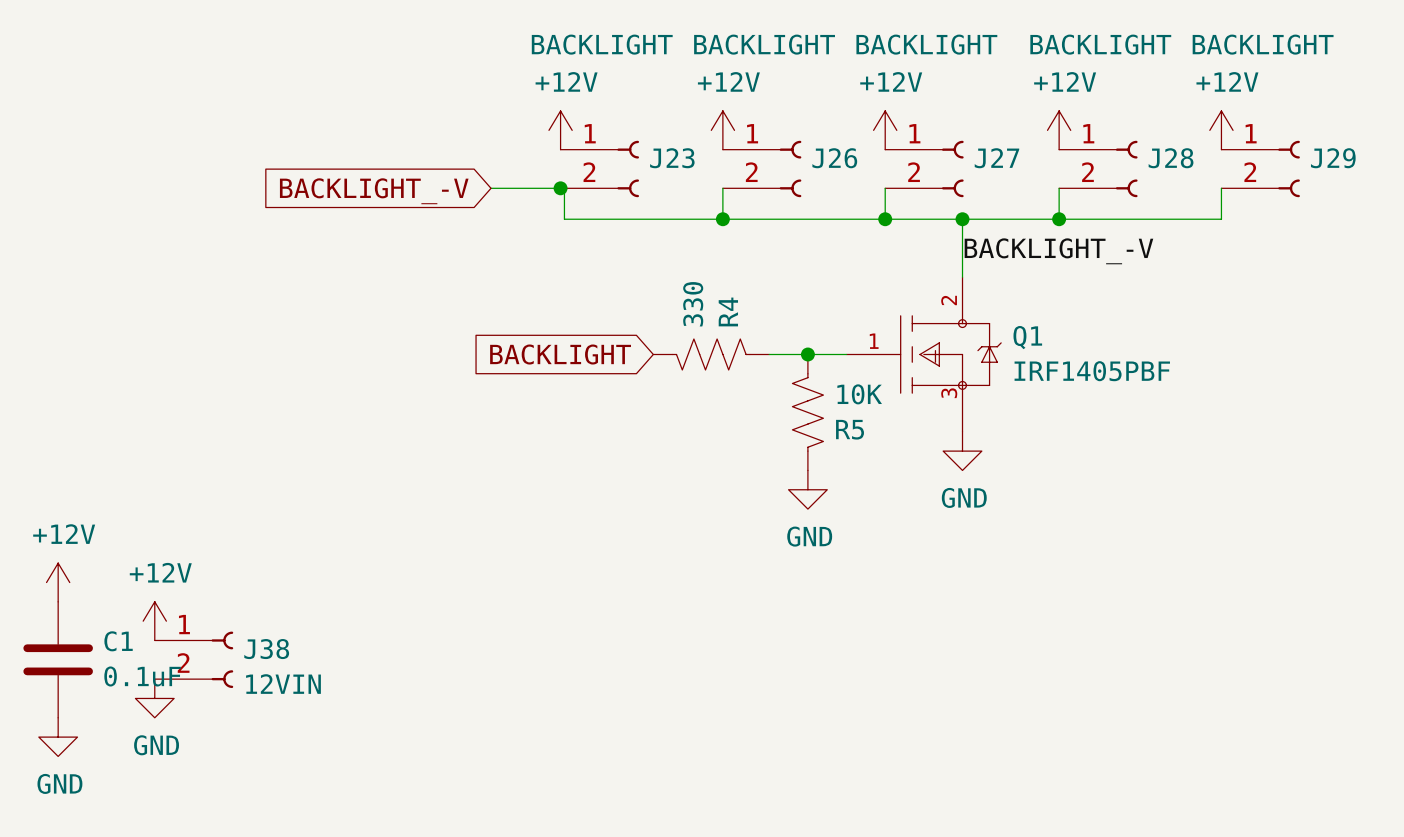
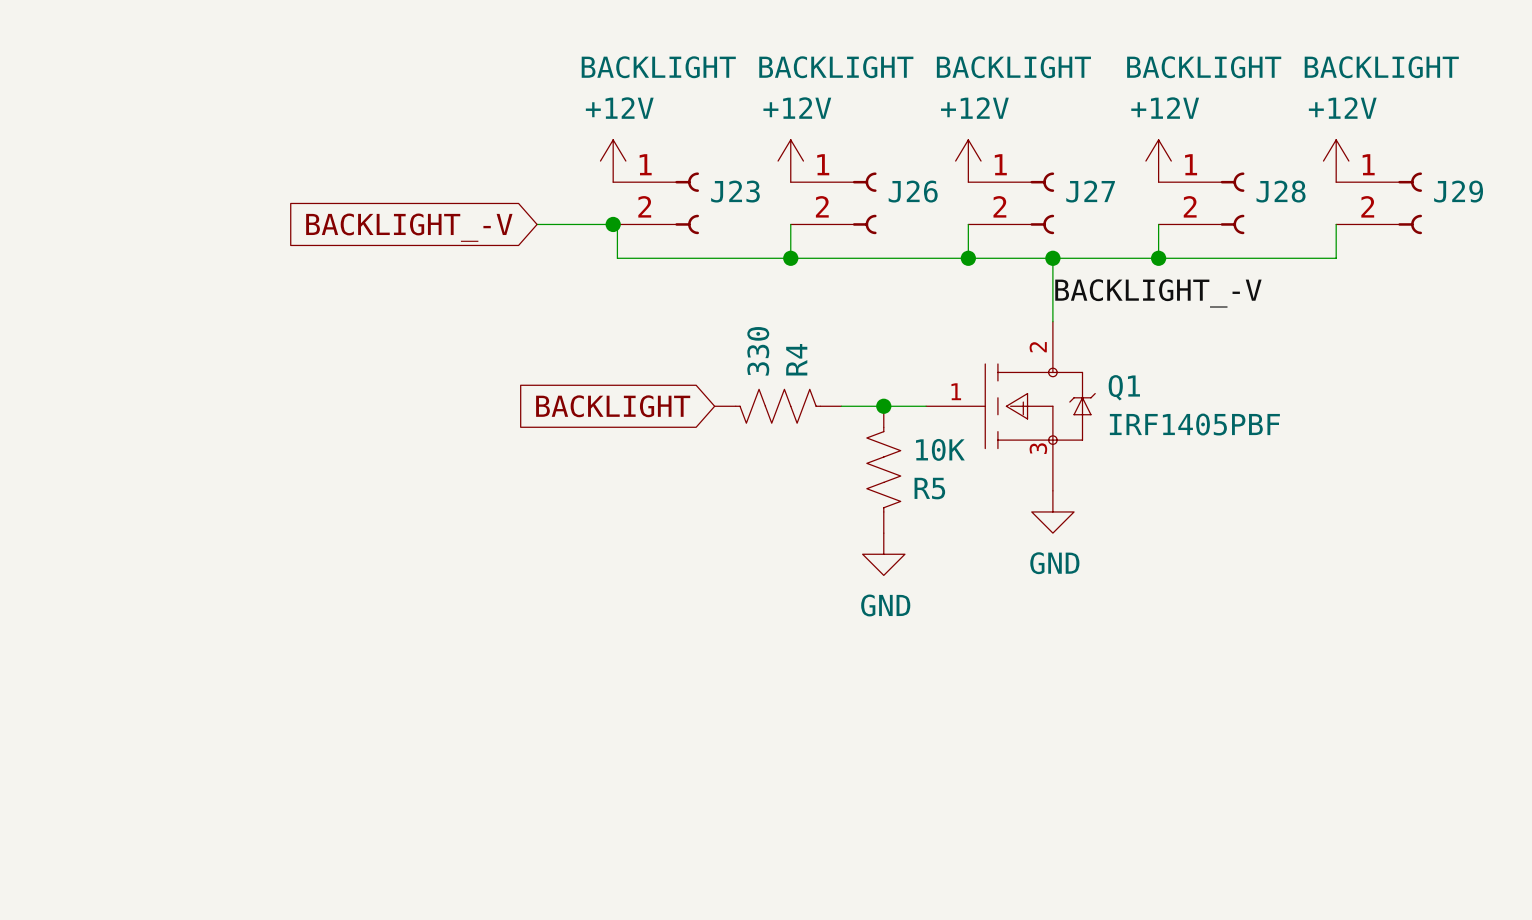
power symbol: +12V (58, 582) -> none
power symbol: +12V (154, 621) -> none
C1: 0.1uF (58, 659) -> none
J38: 12VIN (194, 659) -> none
power symbol: GND (154, 698) -> none
power symbol: GND (58, 737) -> none

